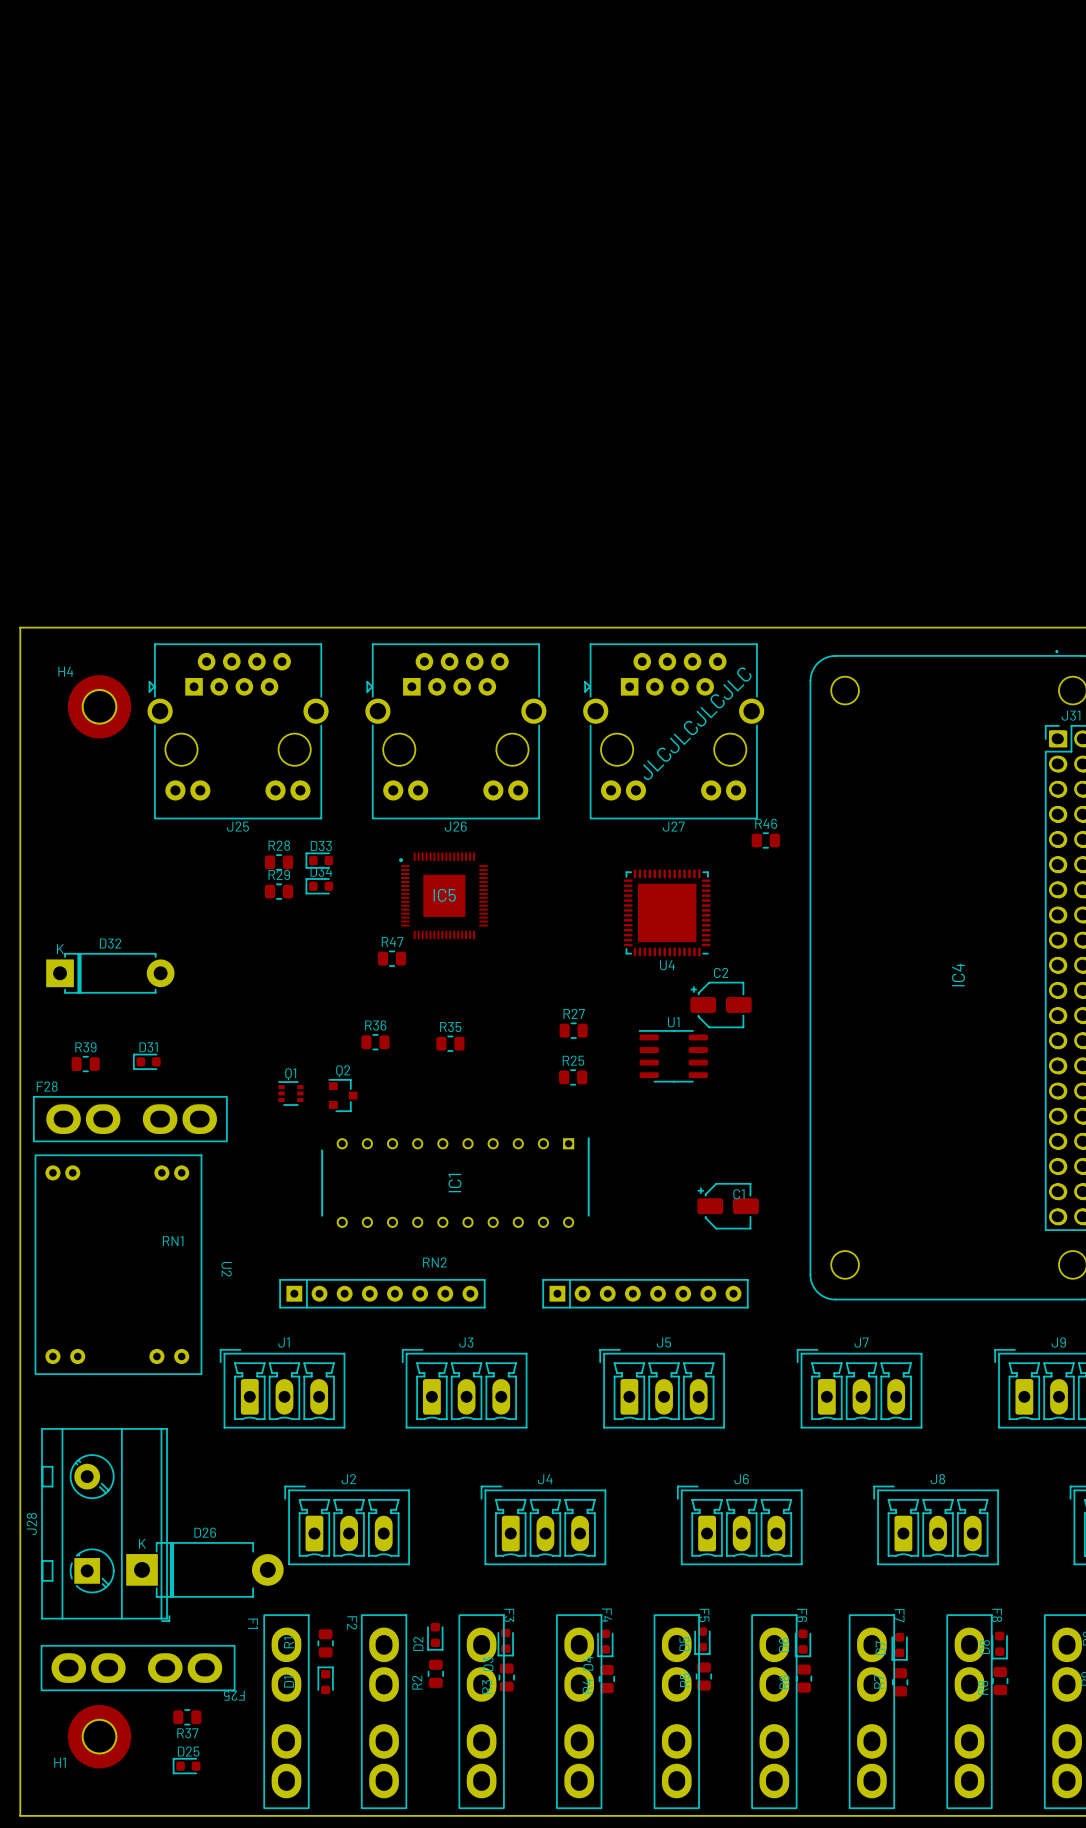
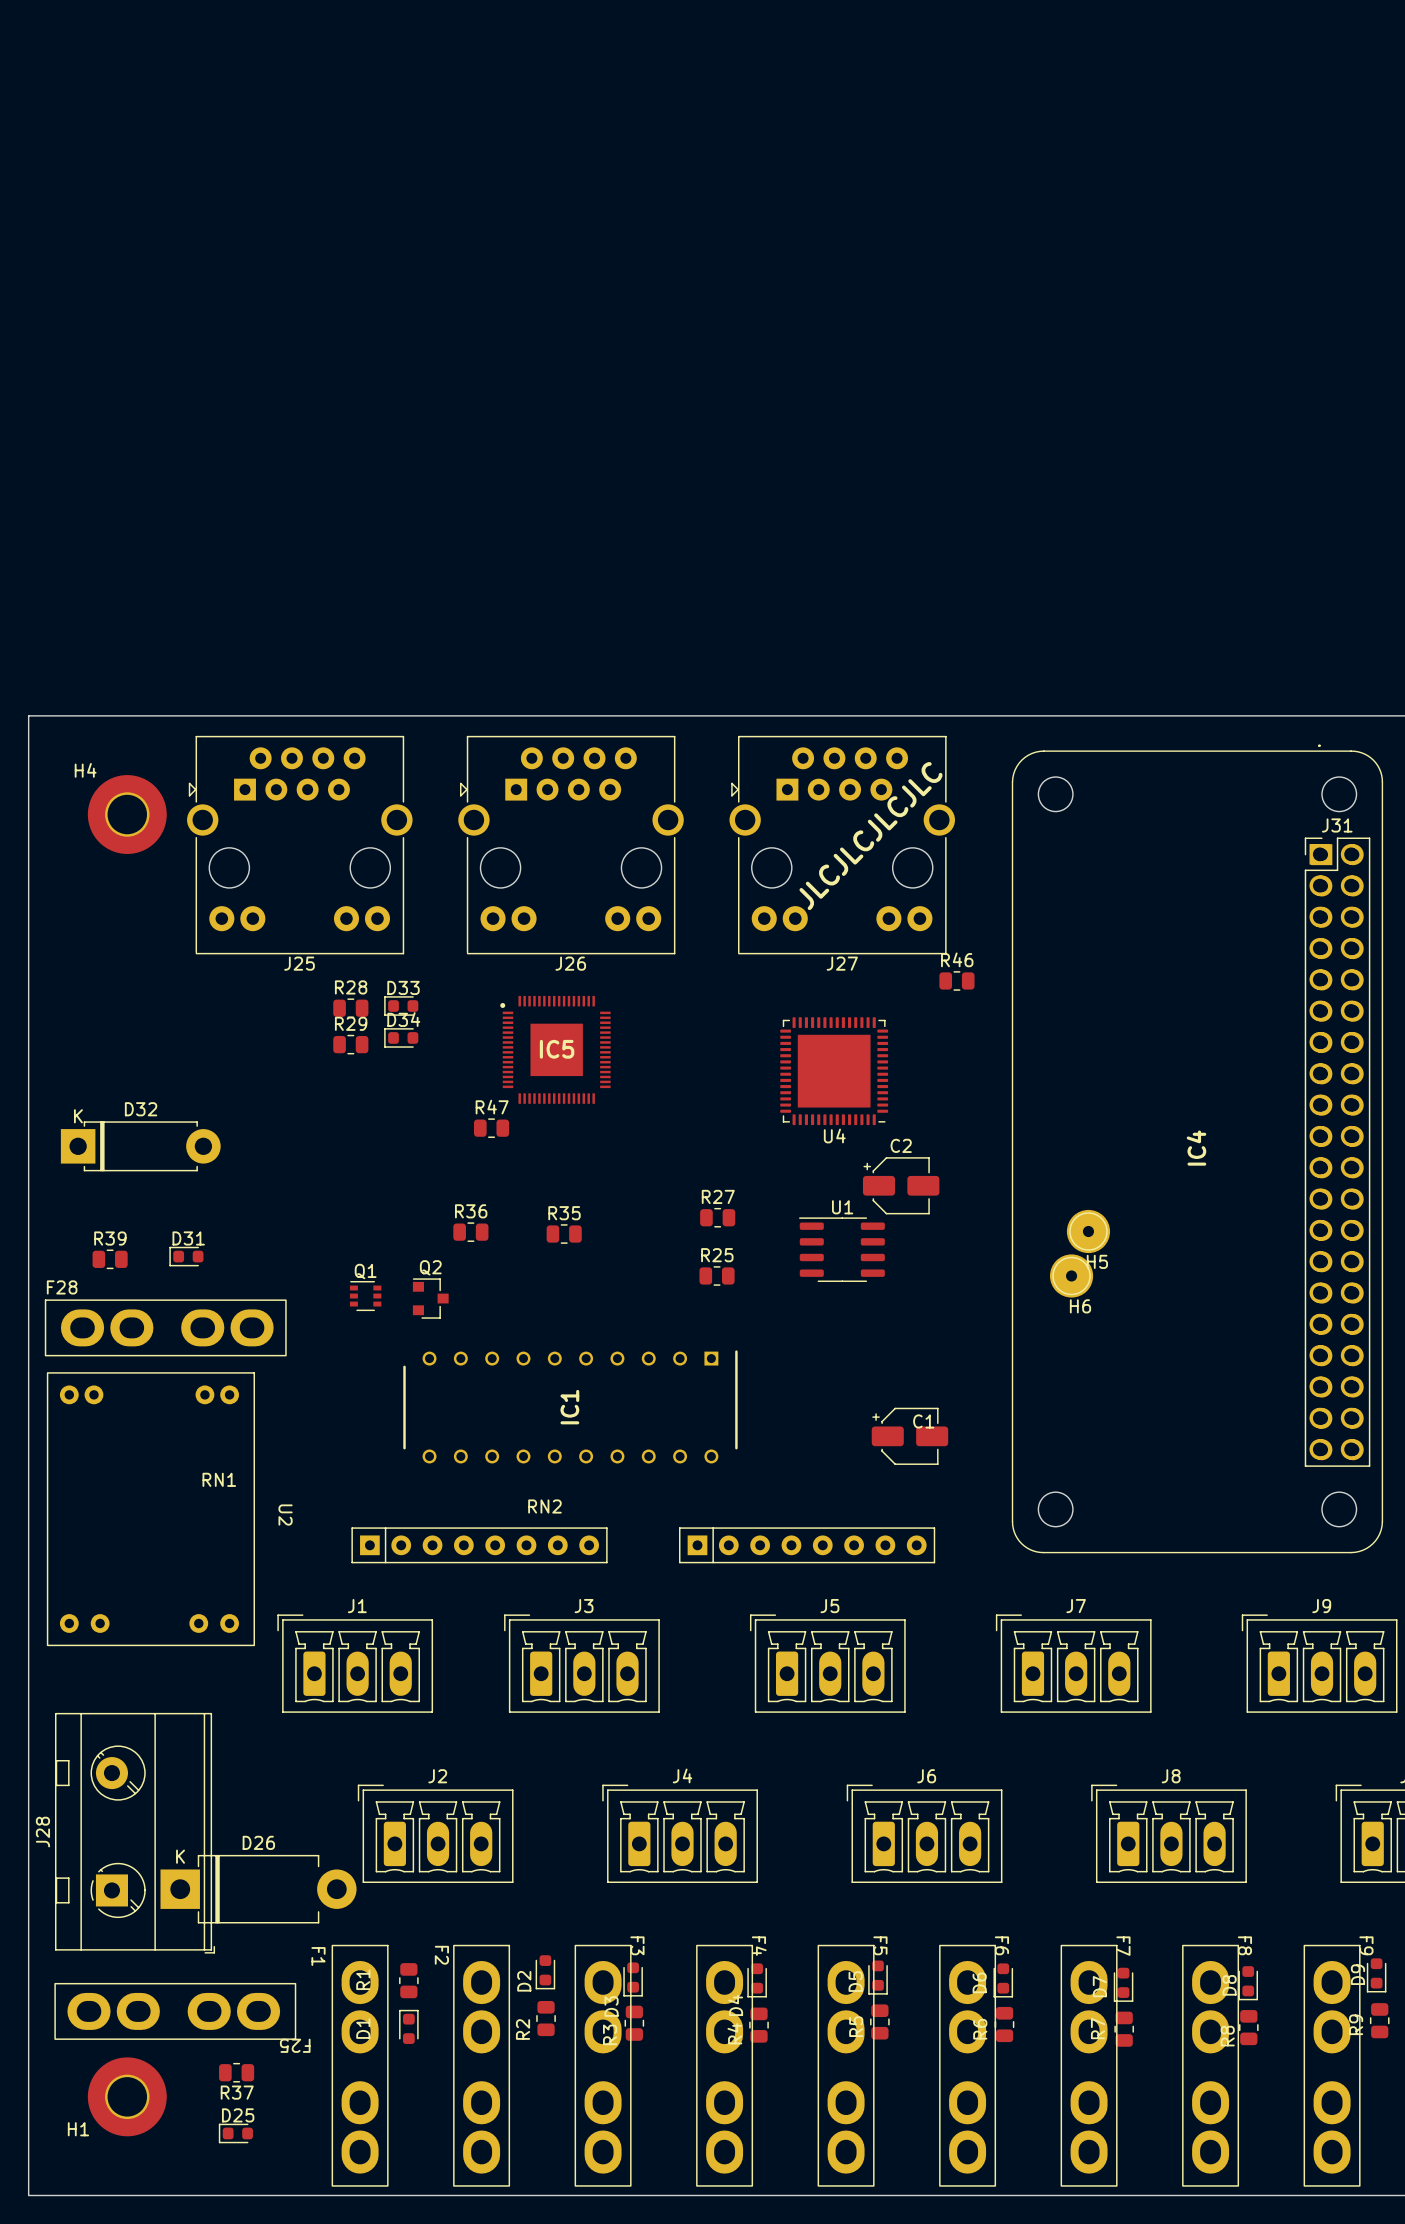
H5: none -> (1088, 1231)
H6: none -> (1071, 1275)

